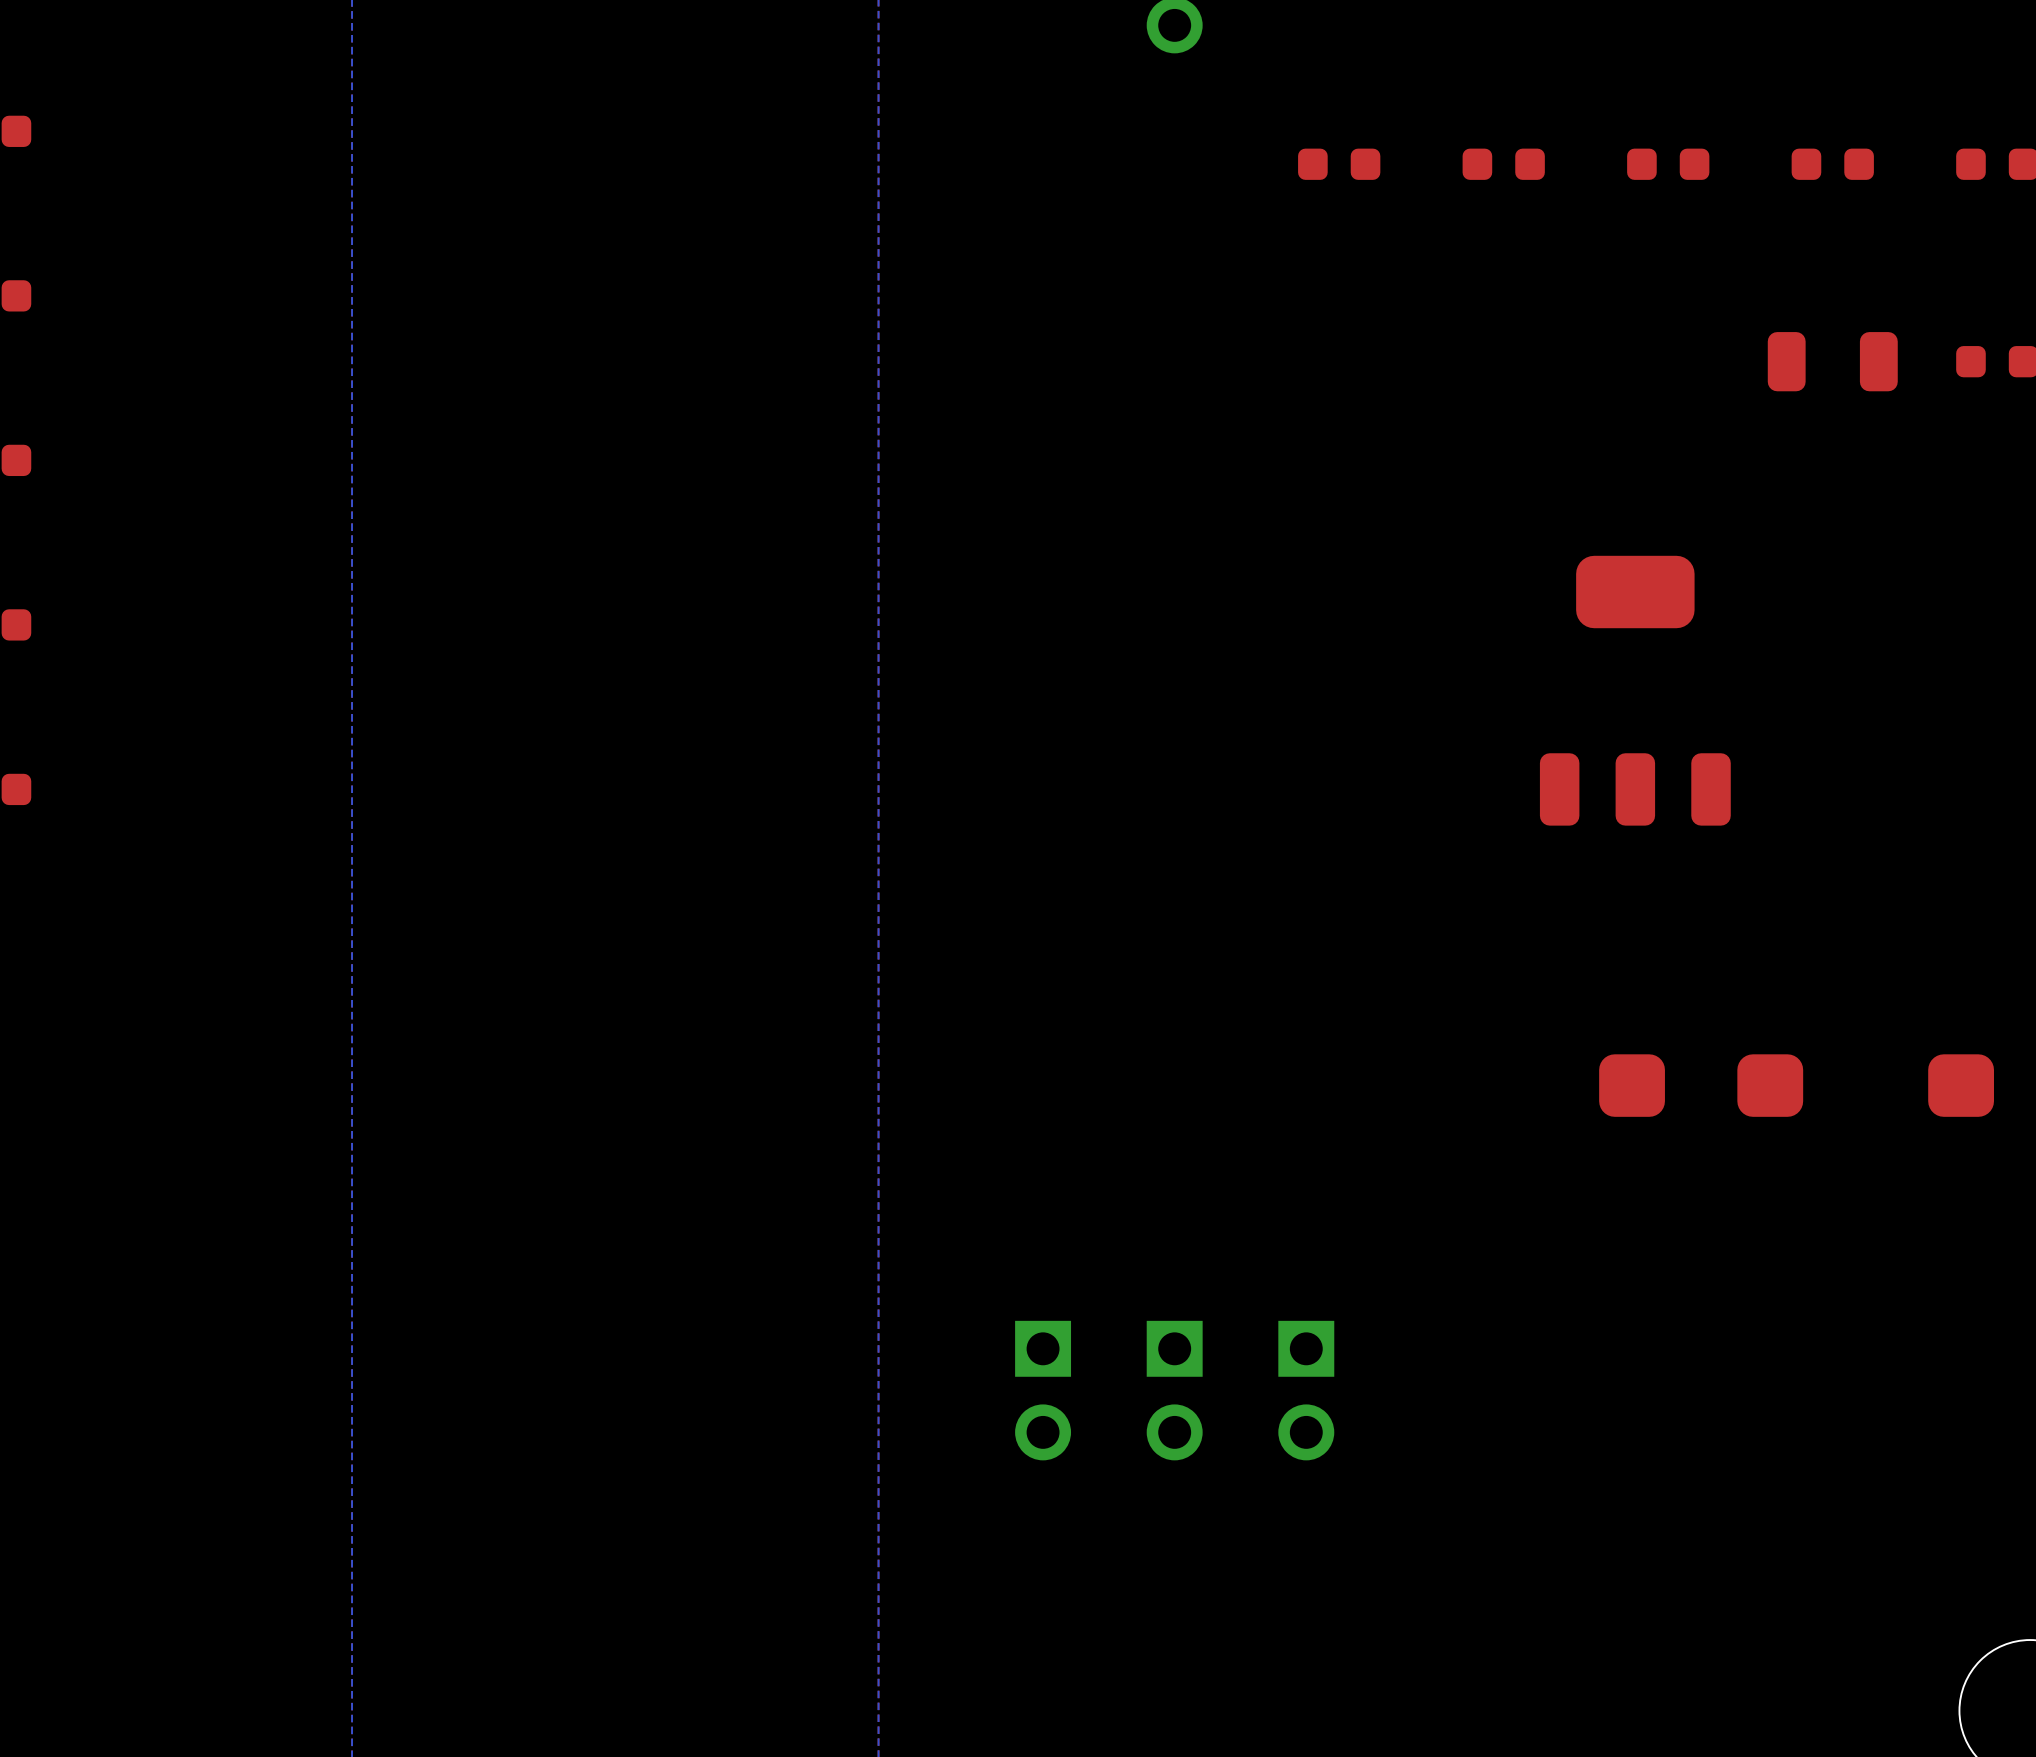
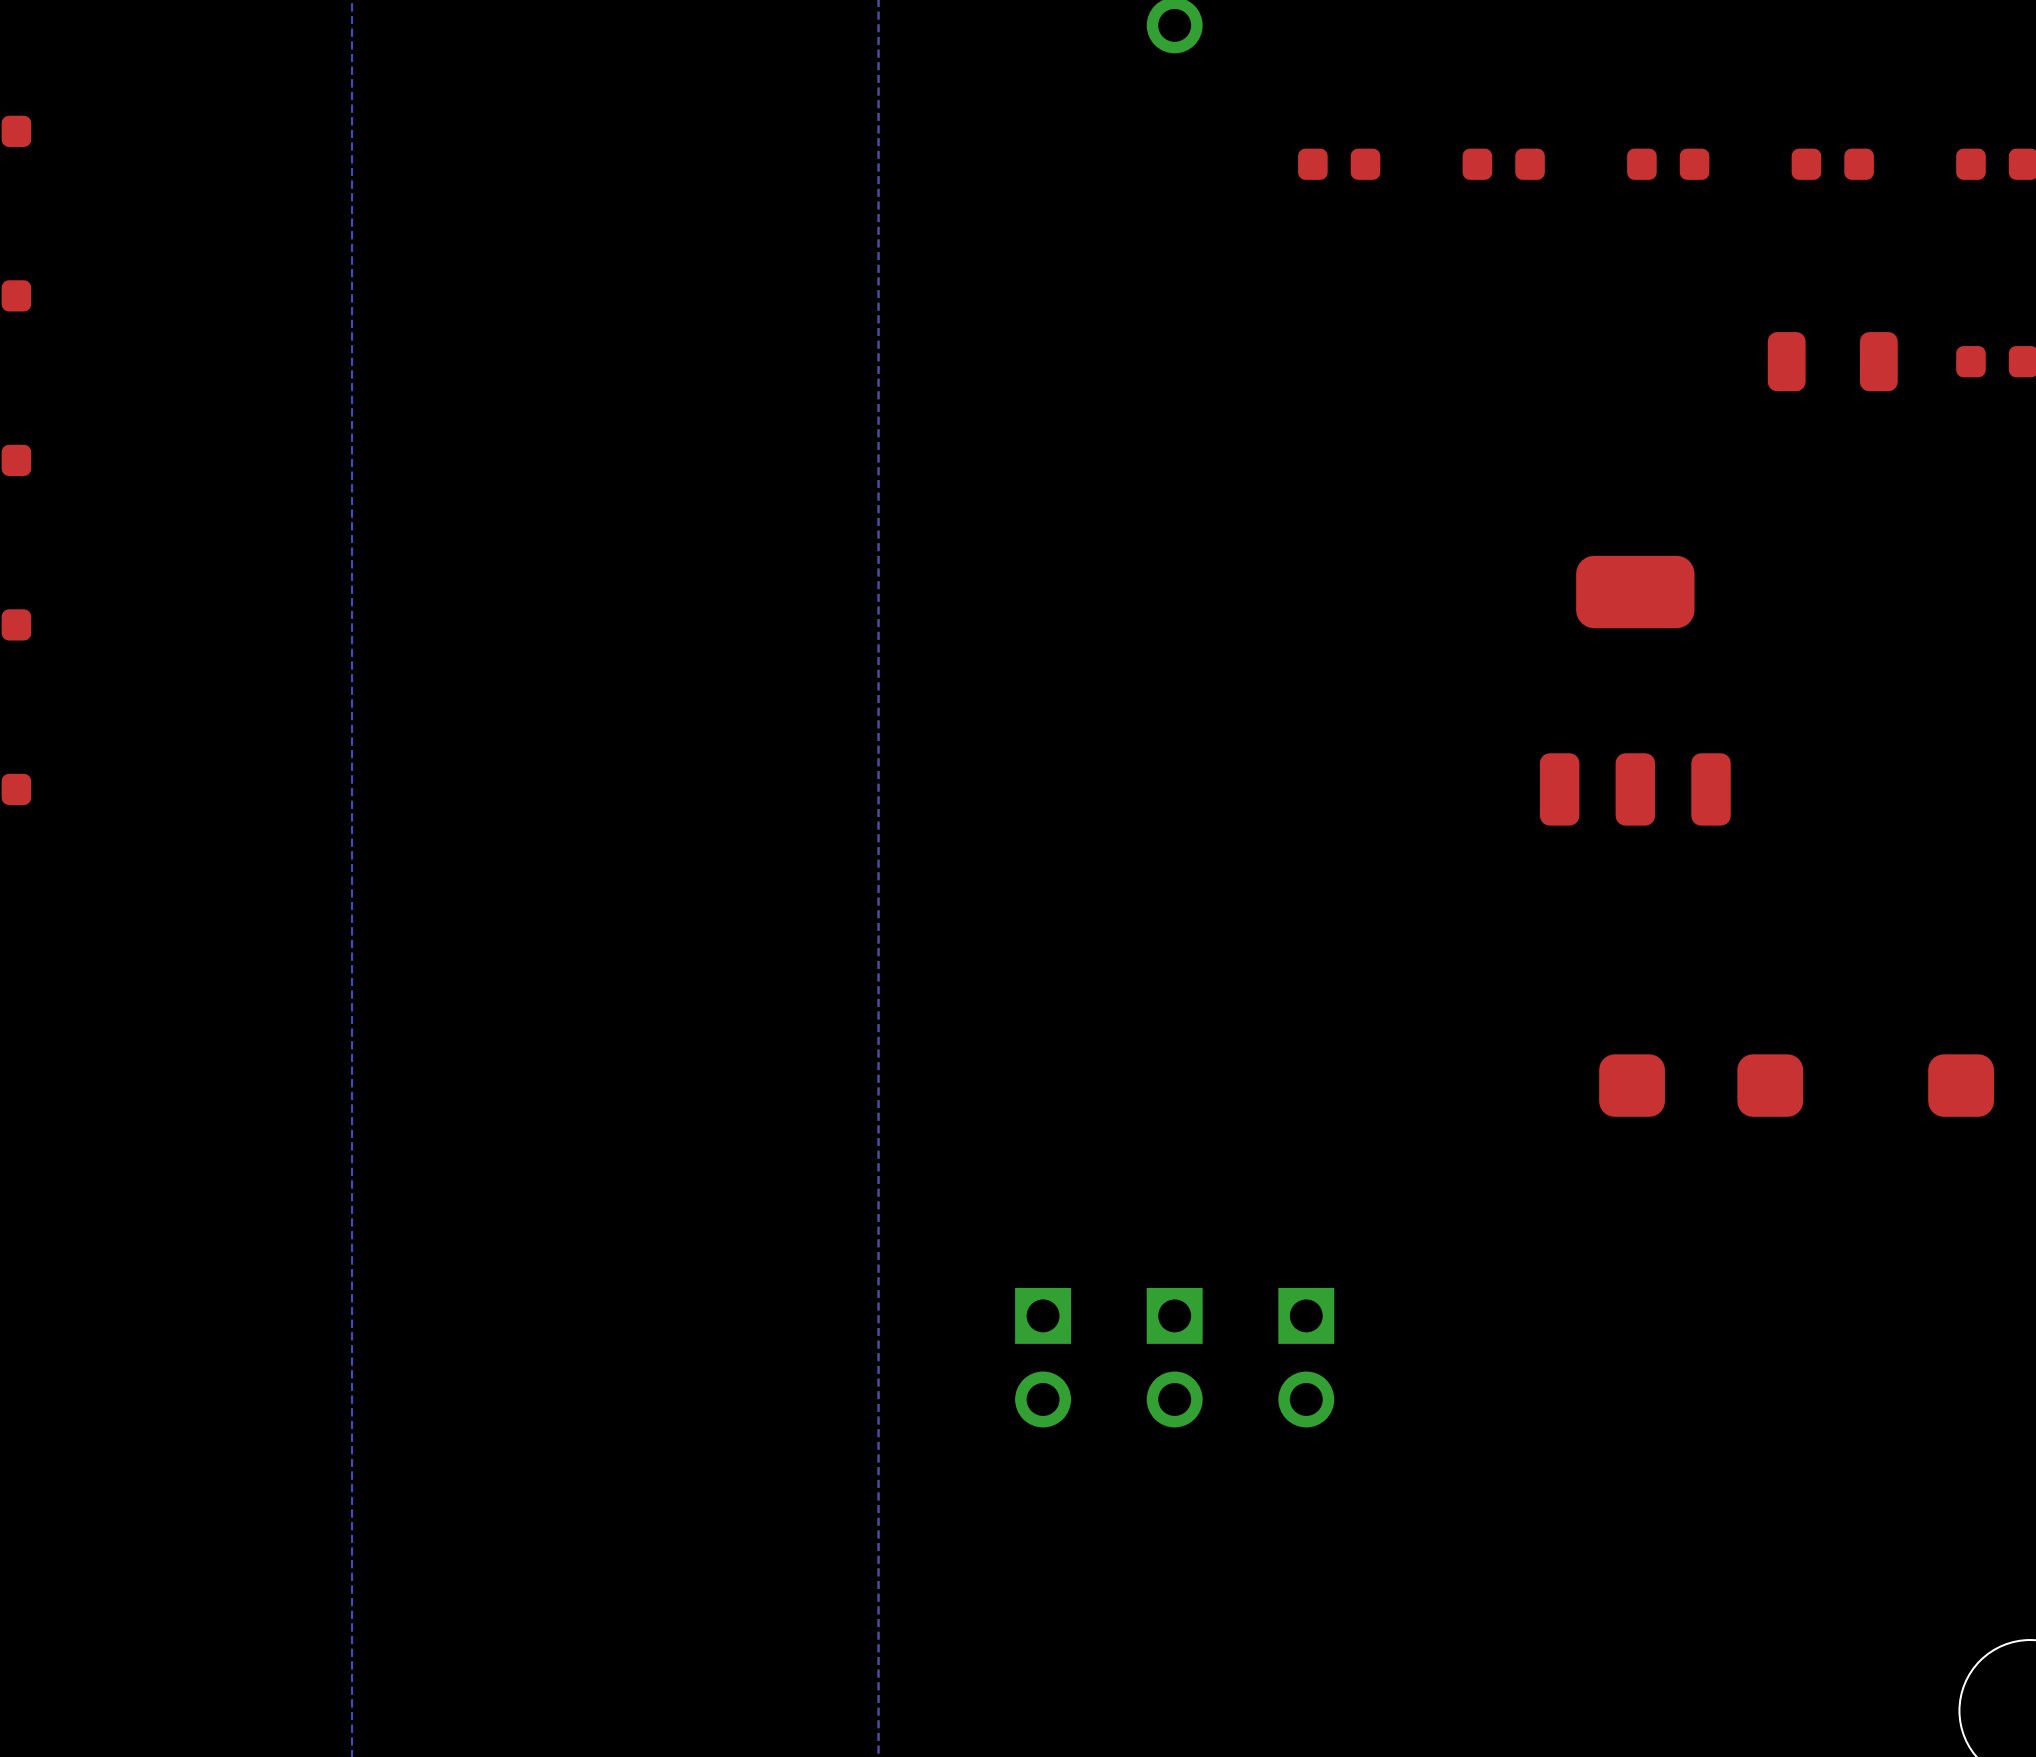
part position: (1043, 1390) -> (1043, 1357)
part position: (1174, 1390) -> (1174, 1357)
part position: (1306, 1390) -> (1306, 1357)

